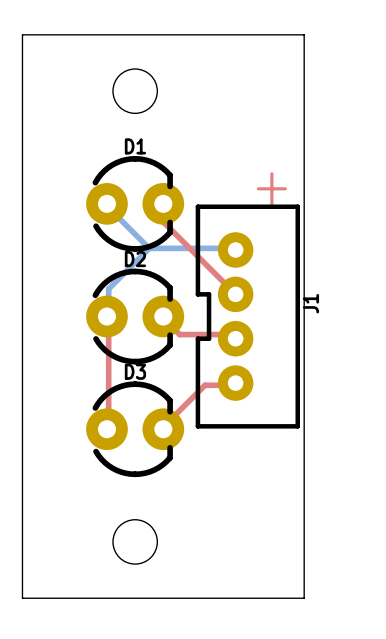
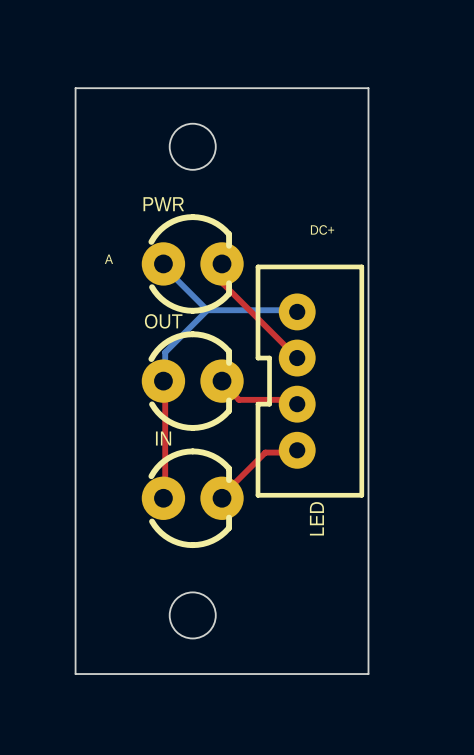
D1 name: D1 (135, 146) -> PWR (163, 204)
text: none -> DC+ (322, 229)
text: + (271, 188) -> none
text: none -> A (108, 259)
D2 name: D2 (135, 259) -> OUT (163, 321)
J1 name: J1 (310, 303) -> LED (316, 518)
D3 name: D3 (135, 371) -> IN (163, 438)

